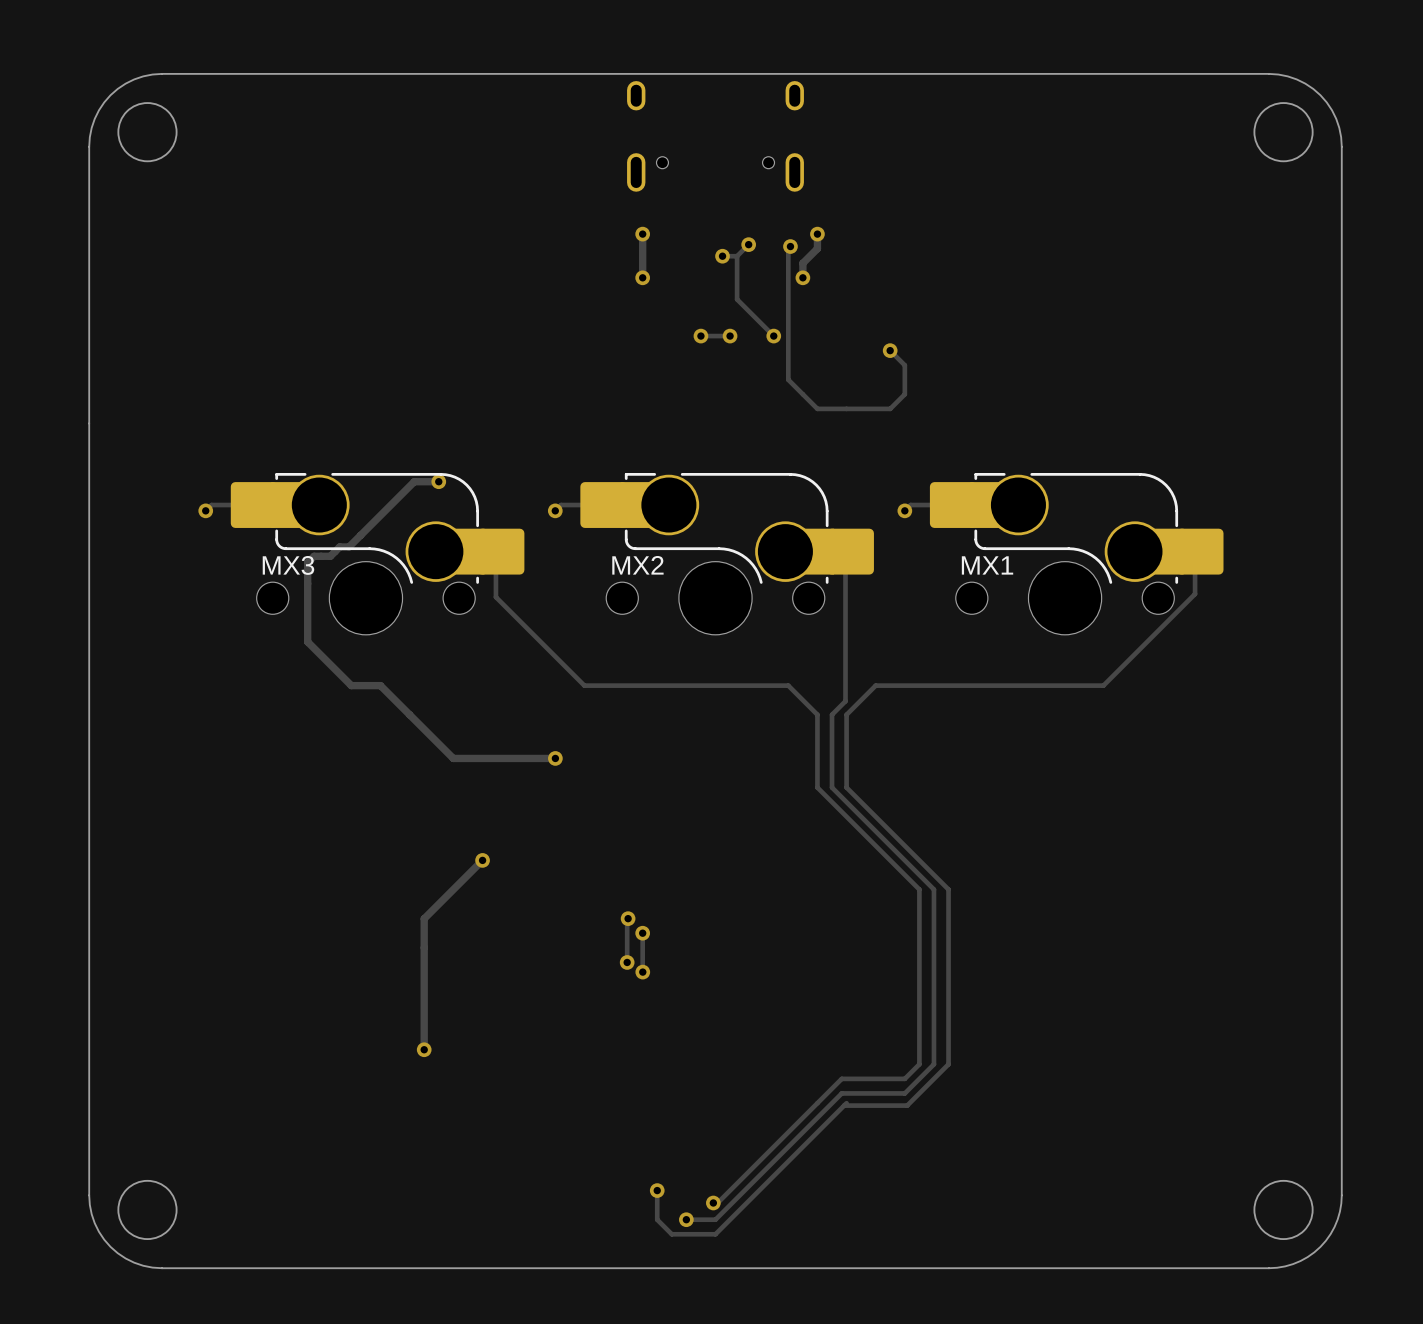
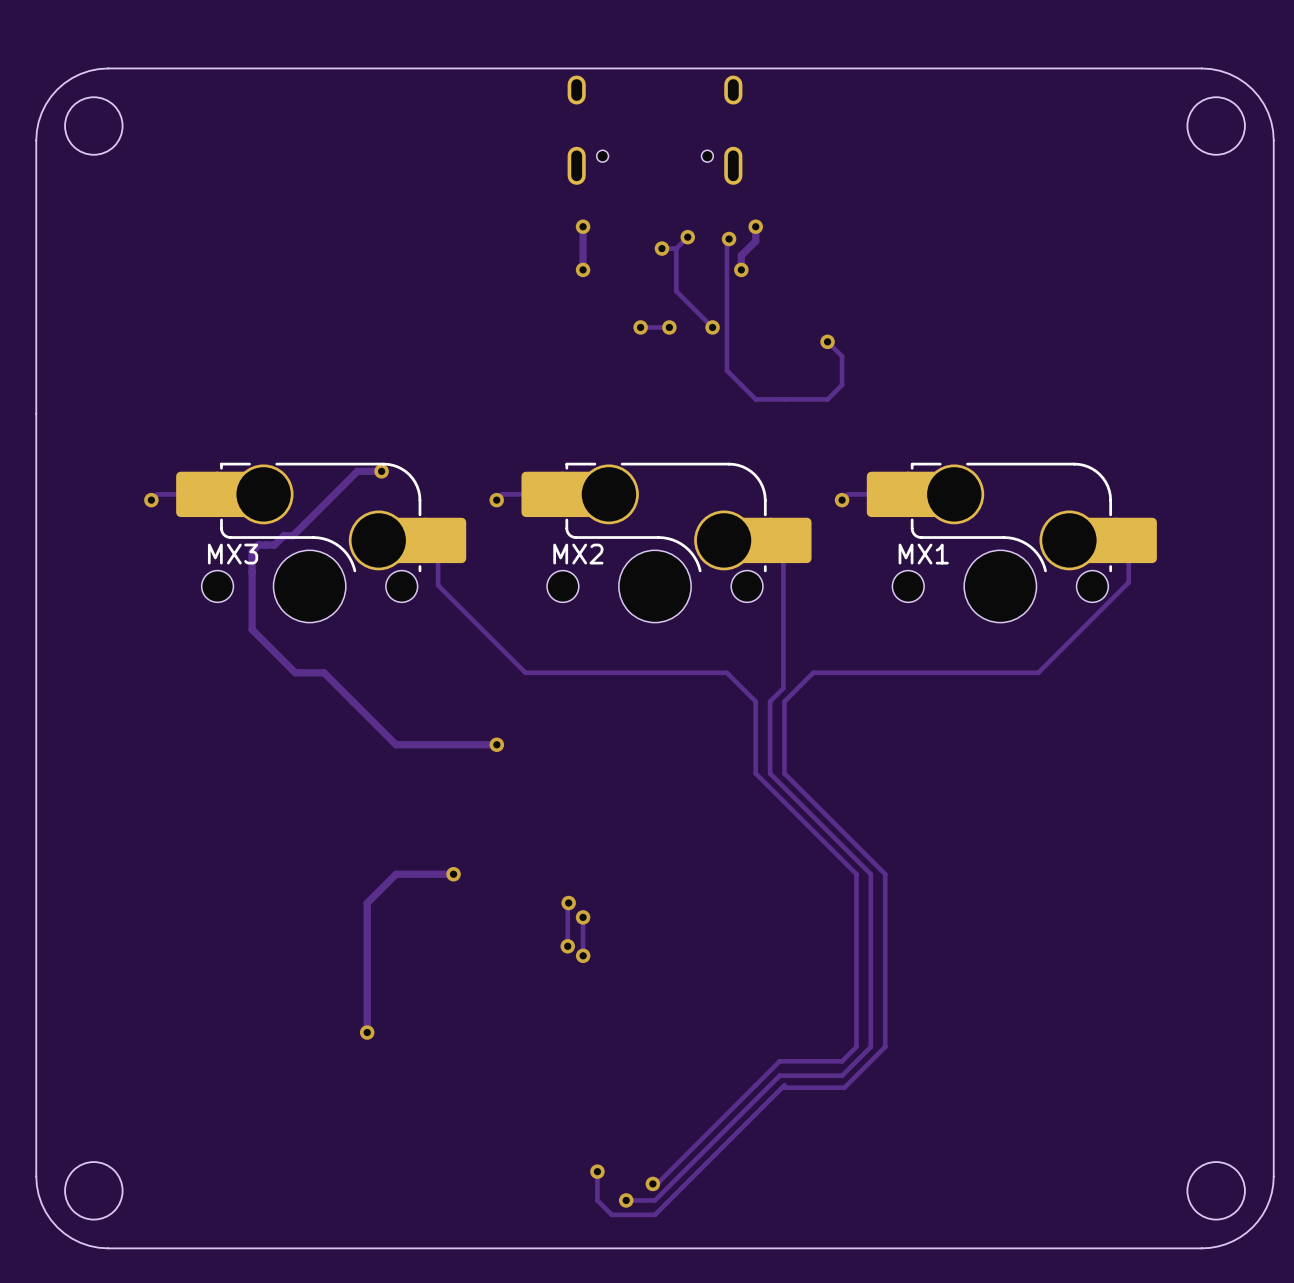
track: (482, 860) (453, 889) -> (453, 874) (396, 874)
via position: (482, 860) -> (453, 874)

